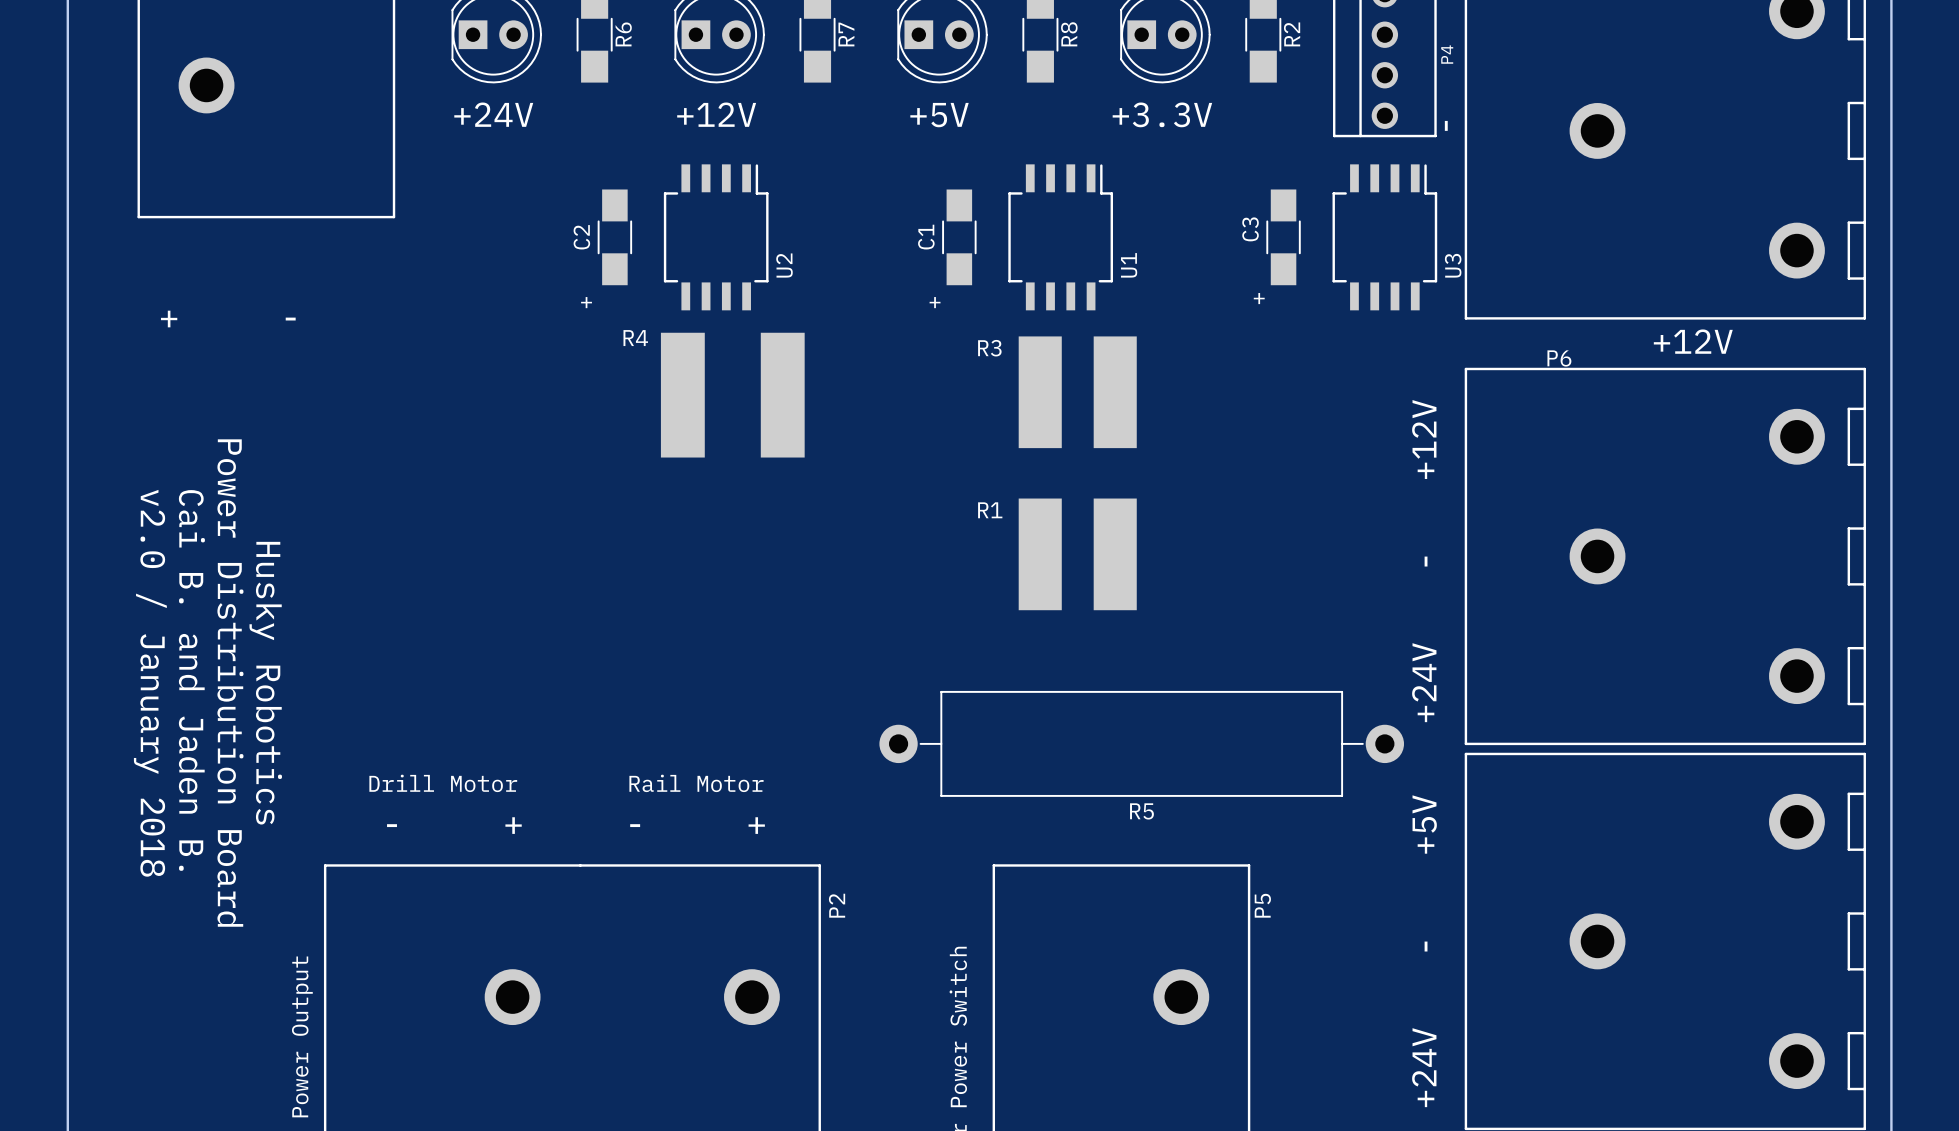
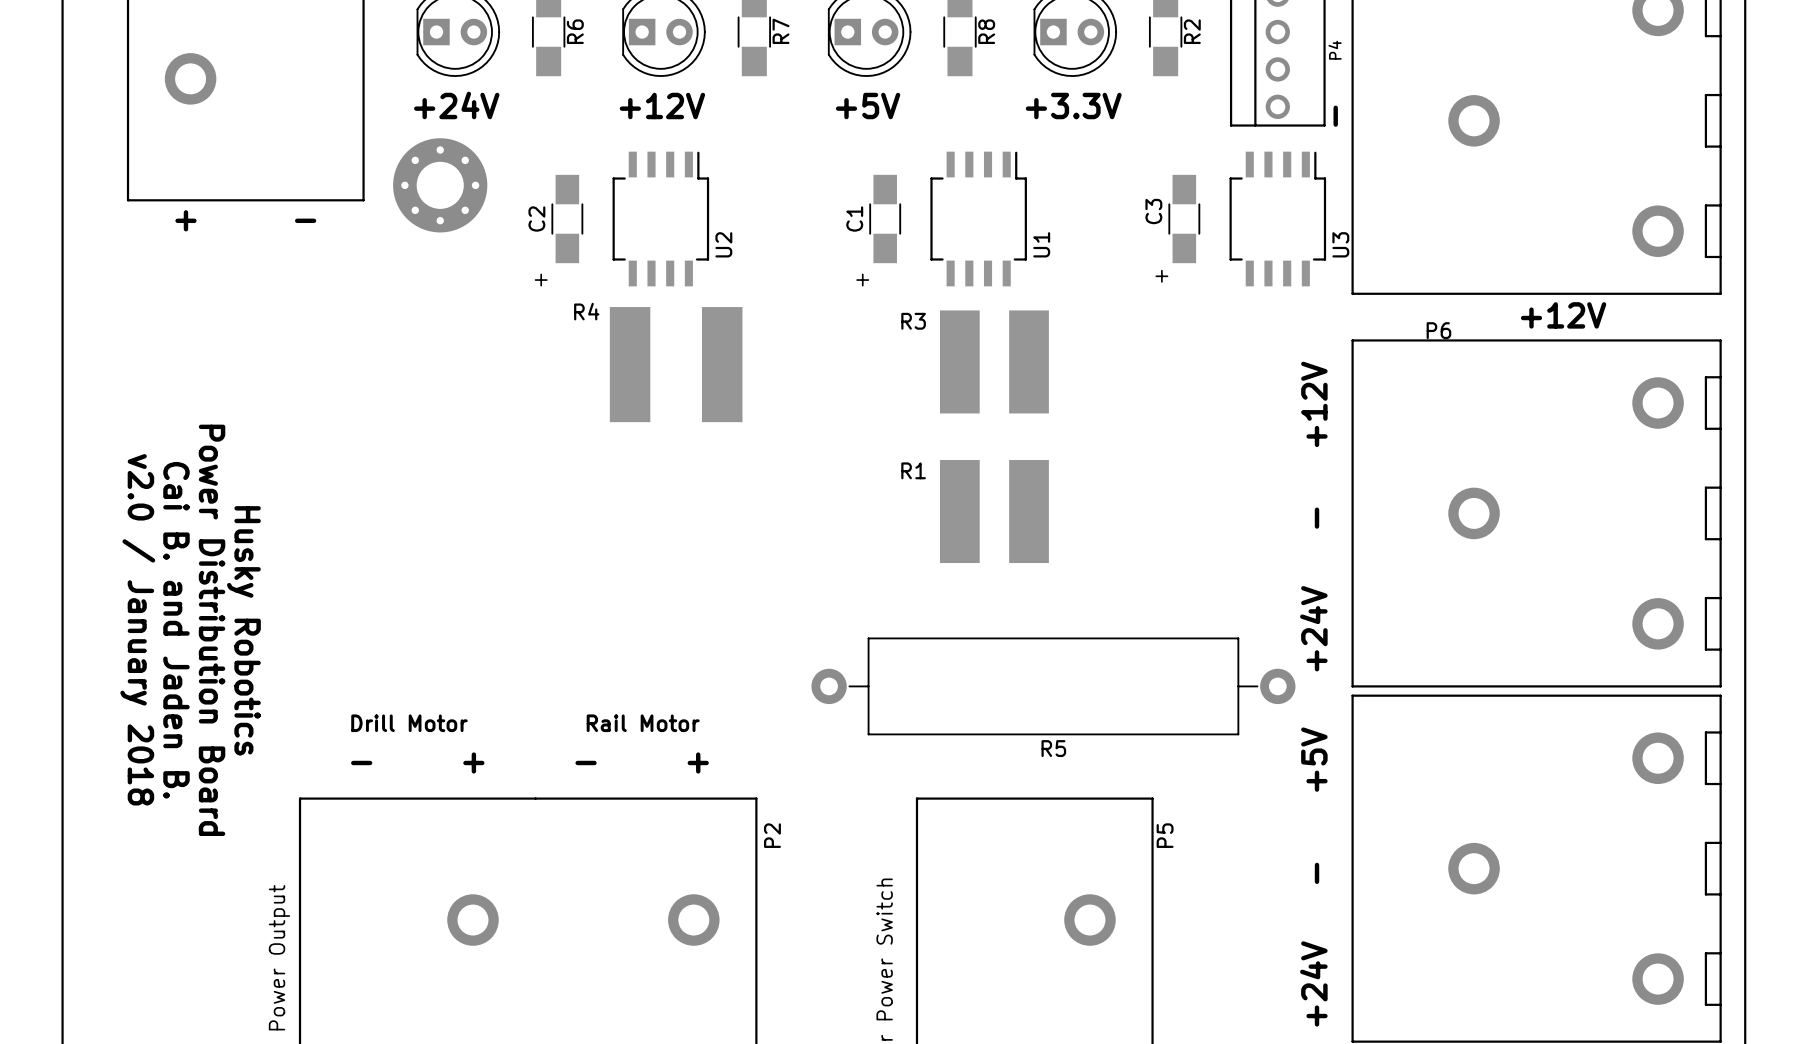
part: none -> (440, 185)
text position: + (169, 319) -> + (185, 220)
text position: - (290, 319) -> - (305, 220)

